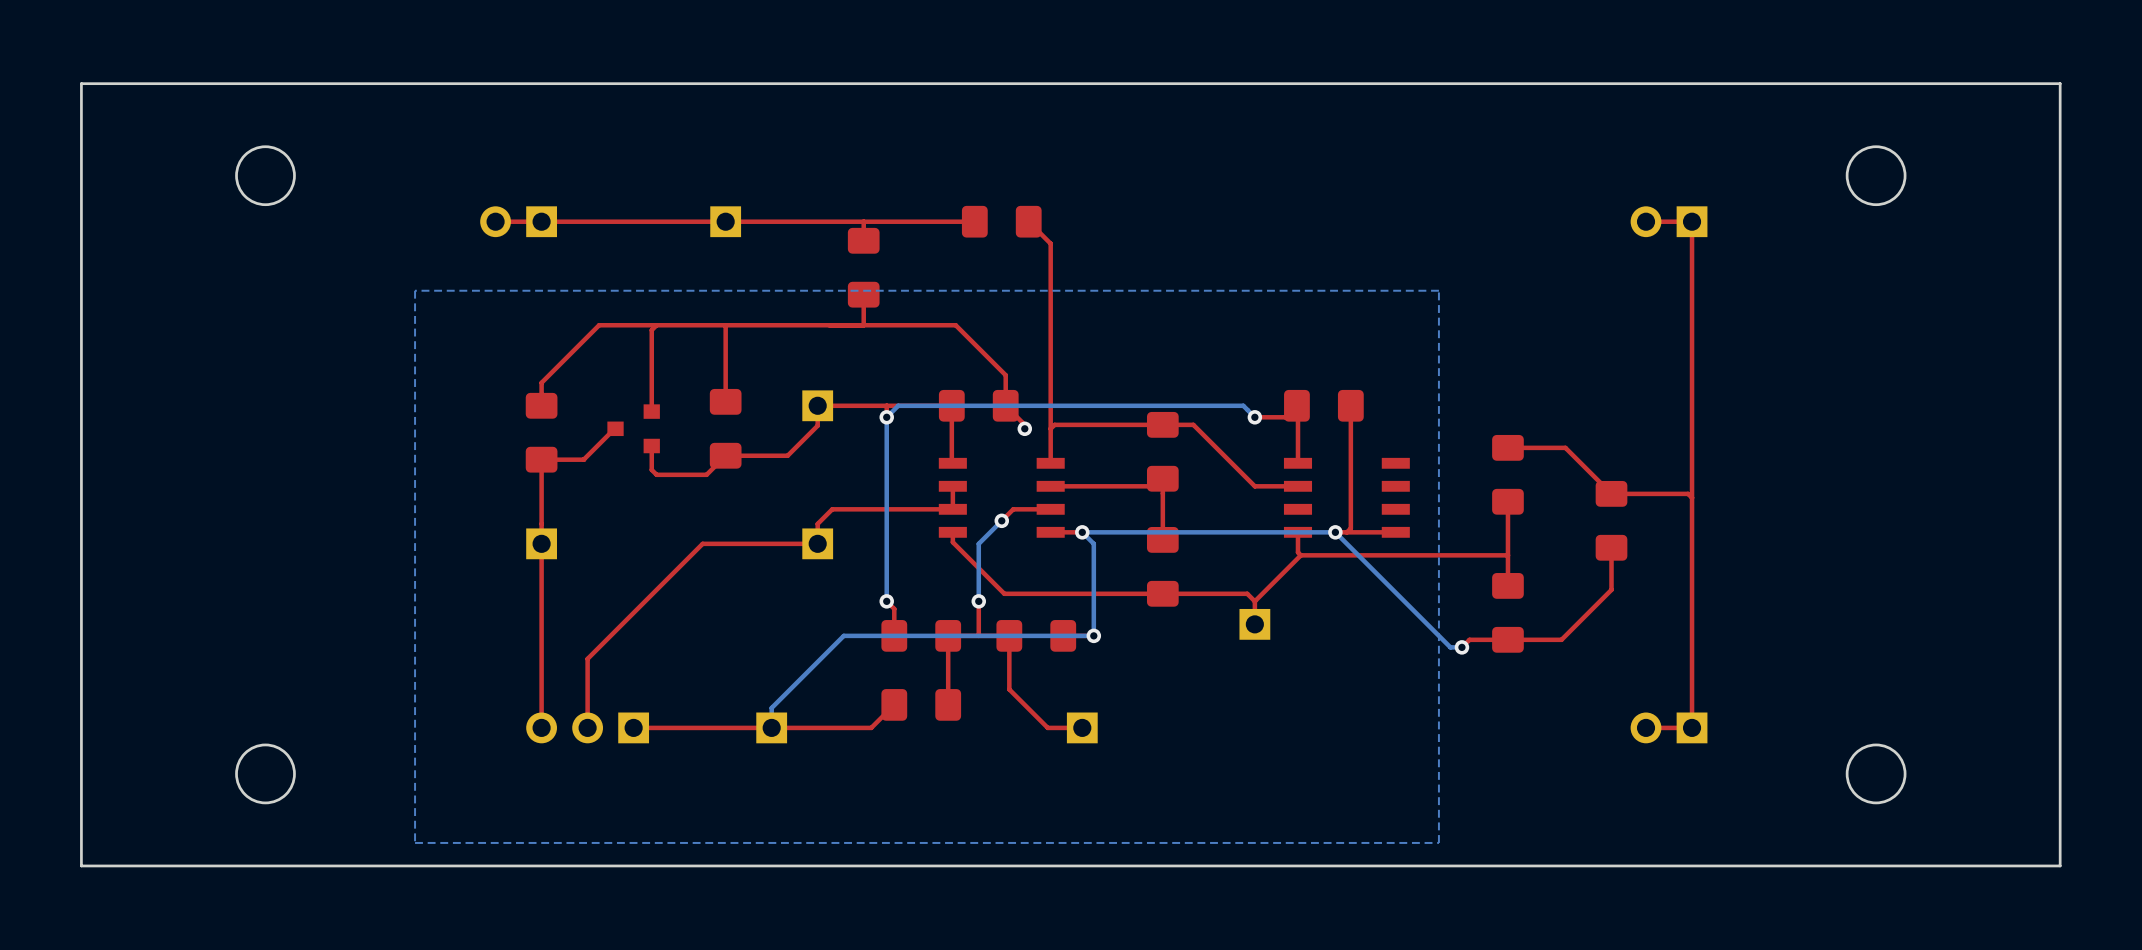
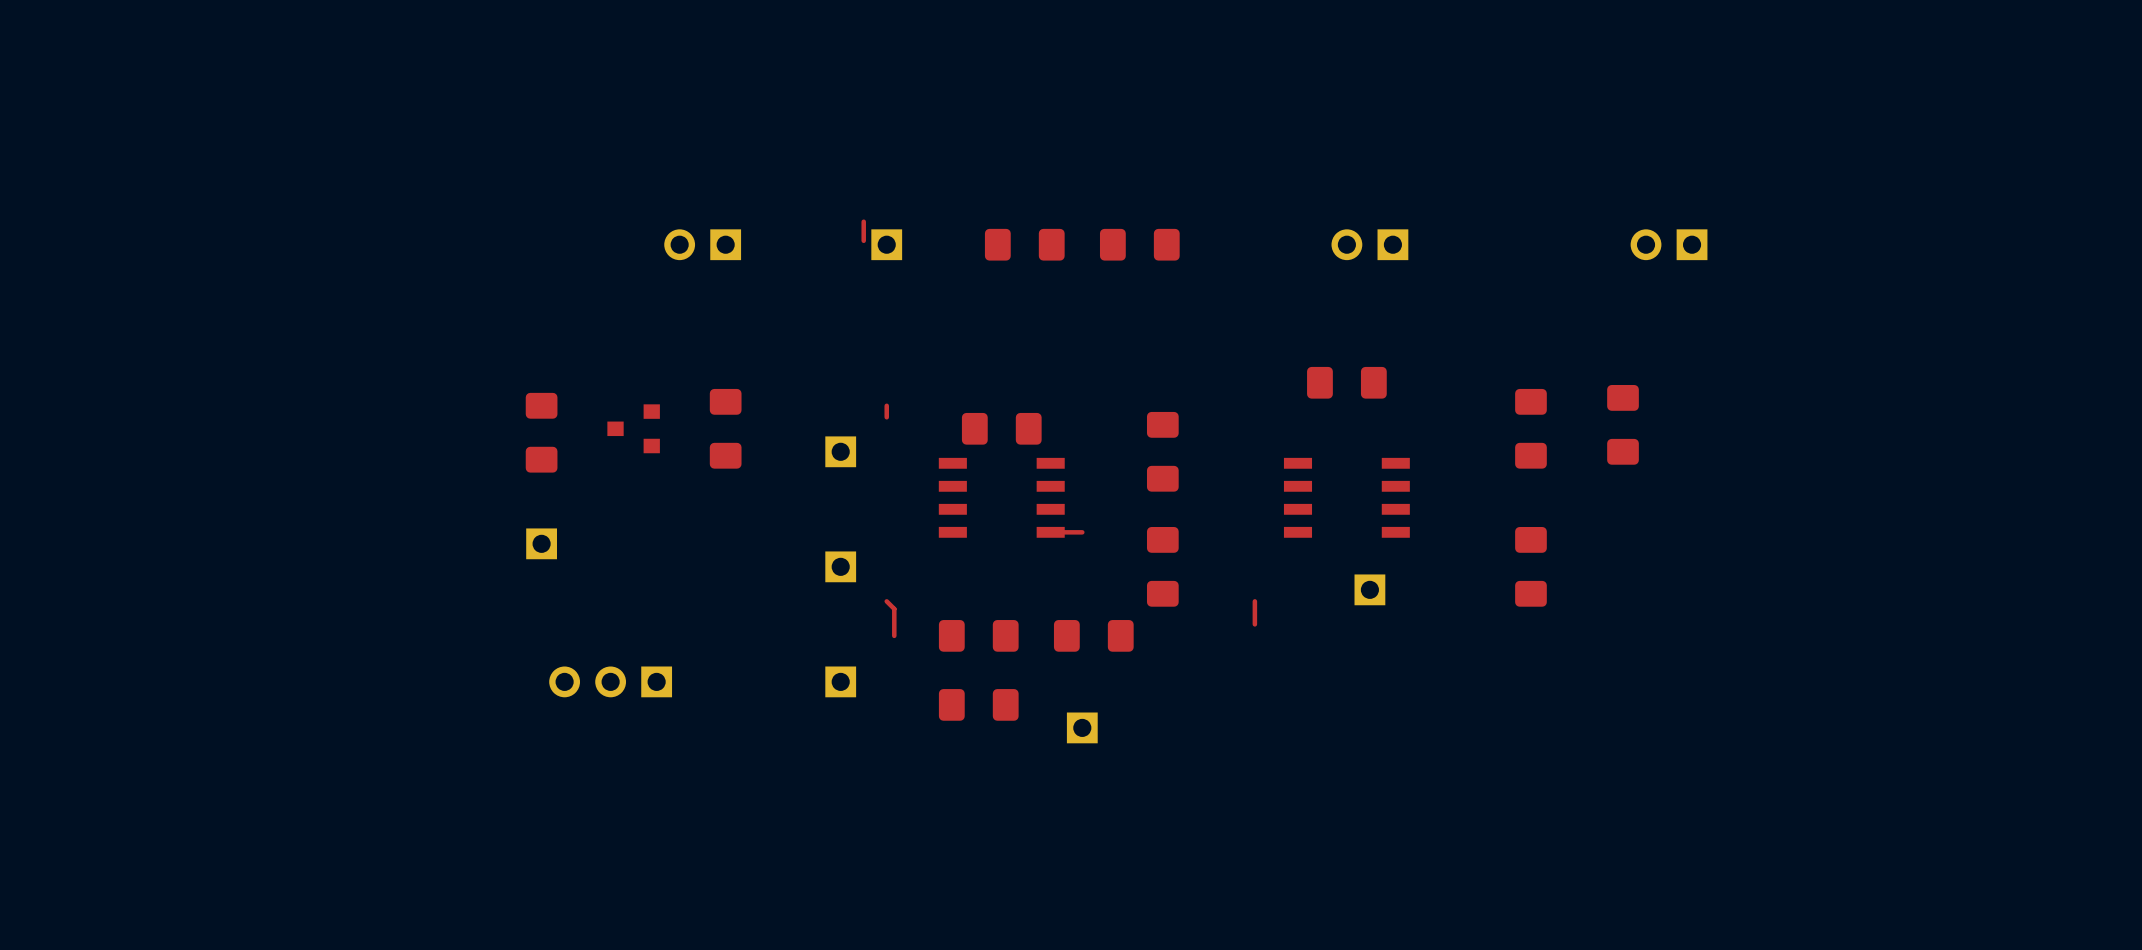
board edge: (2060, 83) (2060, 865) (81, 865) (81, 83) (2060, 83) -> none
round board edge: [235, 145, 296, 207] -> none
round board edge: [1845, 145, 1907, 207] -> none
part position: (518, 221) -> (702, 244)
part: (725, 221) -> none
top track: (974, 221) (495, 221) -> none
part position: (1001, 221) -> (1024, 244)
top track: (1028, 221) (1050, 243) (1050, 463) -> none
top track: (1646, 221) (1692, 221) (1692, 727) (1646, 727) -> none
part position: (1669, 221) -> (1669, 244)
part: none -> (886, 244)
part: none -> (1139, 244)
part: none -> (1369, 244)
part: (863, 267) -> none
bottom zone outline: (1438, 290) (415, 290) (415, 842) (1438, 842) (1438, 290) -> none
top track: (863, 294) (863, 325) -> none
top track: (656, 325) (651, 330) (651, 411) -> none
top track: (725, 325) (725, 401) -> none
top track: (541, 405) (541, 382) (599, 325) (955, 325) (1005, 375) (1005, 405) (1024, 424) (1024, 428) -> none
part: (817, 405) -> none
part position: (978, 405) -> (1001, 428)
part position: (1323, 405) -> (1346, 382)
top track: (1350, 405) (1350, 528) (1346, 532) -> none
via: (886, 417) -> none
top track: (1254, 417) (1285, 417) (1297, 406) (1297, 463) -> none
bottom track: (1254, 417) (1243, 405) (898, 405) (886, 417) (886, 601) -> none
via: (1254, 417) -> none
part: none -> (1623, 424)
top track: (615, 428) (583, 459) -> none
via: (1024, 428) -> none
top track: (1050, 428) (1054, 424) (1193, 424) (1254, 486) (1297, 486) -> none
part: none -> (1530, 428)
top track: (651, 446) (651, 469) (656, 474) (706, 474) (725, 455) (787, 455) (817, 425) (817, 405) (951, 405) (952, 463) -> none
top track: (1507, 447) (1565, 447) (1611, 493) (1688, 493) (1692, 497) -> none
part: none -> (840, 451)
top track: (583, 459) (541, 459) (541, 727) -> none
part: (1507, 474) -> none
top track: (1162, 478) (1162, 539) -> none
top track: (952, 486) (952, 509) (832, 509) (817, 523) (817, 543) (702, 543) (587, 658) (587, 727) -> none
top track: (1151, 486) (1050, 486) -> none
top track: (1507, 501) (1507, 585) -> none
top track: (1050, 509) (1013, 509) (1001, 520) -> none
bottom track: (1001, 520) (978, 543) (978, 601) -> none
via: (1001, 520) -> none
part: (1611, 520) -> none
top track: (952, 532) (952, 542) (1004, 593) (1247, 593) (1254, 601) (1300, 555) -> none
via: (1082, 532) -> none
top track: (1297, 532) (1297, 552) (1300, 555) -> none
via: (1335, 532) -> none
top track: (1395, 532) (1335, 532) -> none
part position: (817, 543) -> (840, 566)
top track: (1611, 547) (1611, 589) (1561, 639) (1469, 639) (1461, 647) -> none
top track: (1507, 555) (1300, 555) -> none
part: none -> (1530, 566)
via: (886, 601) -> none
top track: (978, 601) (978, 635) -> none
via: (978, 601) -> none
part: (1507, 612) -> none
part position: (1254, 624) -> (1369, 589)
part: (921, 635) -> none
part: none -> (978, 635)
part: (1036, 635) -> none
part: none -> (1093, 635)
via: (1093, 635) -> none
bottom track: (1461, 647) (1450, 647) (1335, 532) (1082, 532) (1093, 543) (1093, 635) (843, 635) (771, 707) (771, 727) -> none
via: (1461, 647) -> none
part: none -> (840, 681)
top track: (894, 704) (871, 727) (633, 727) -> none
part: (921, 704) -> none
top track: (948, 704) (948, 635) (1009, 635) (1009, 689) (1047, 727) (1082, 727) -> none
part: none -> (978, 704)
part position: (587, 727) -> (610, 681)
part: (771, 727) -> none
part: (1669, 727) -> none
round board edge: [235, 743, 296, 805] -> none
round board edge: [1845, 743, 1907, 805] -> none

